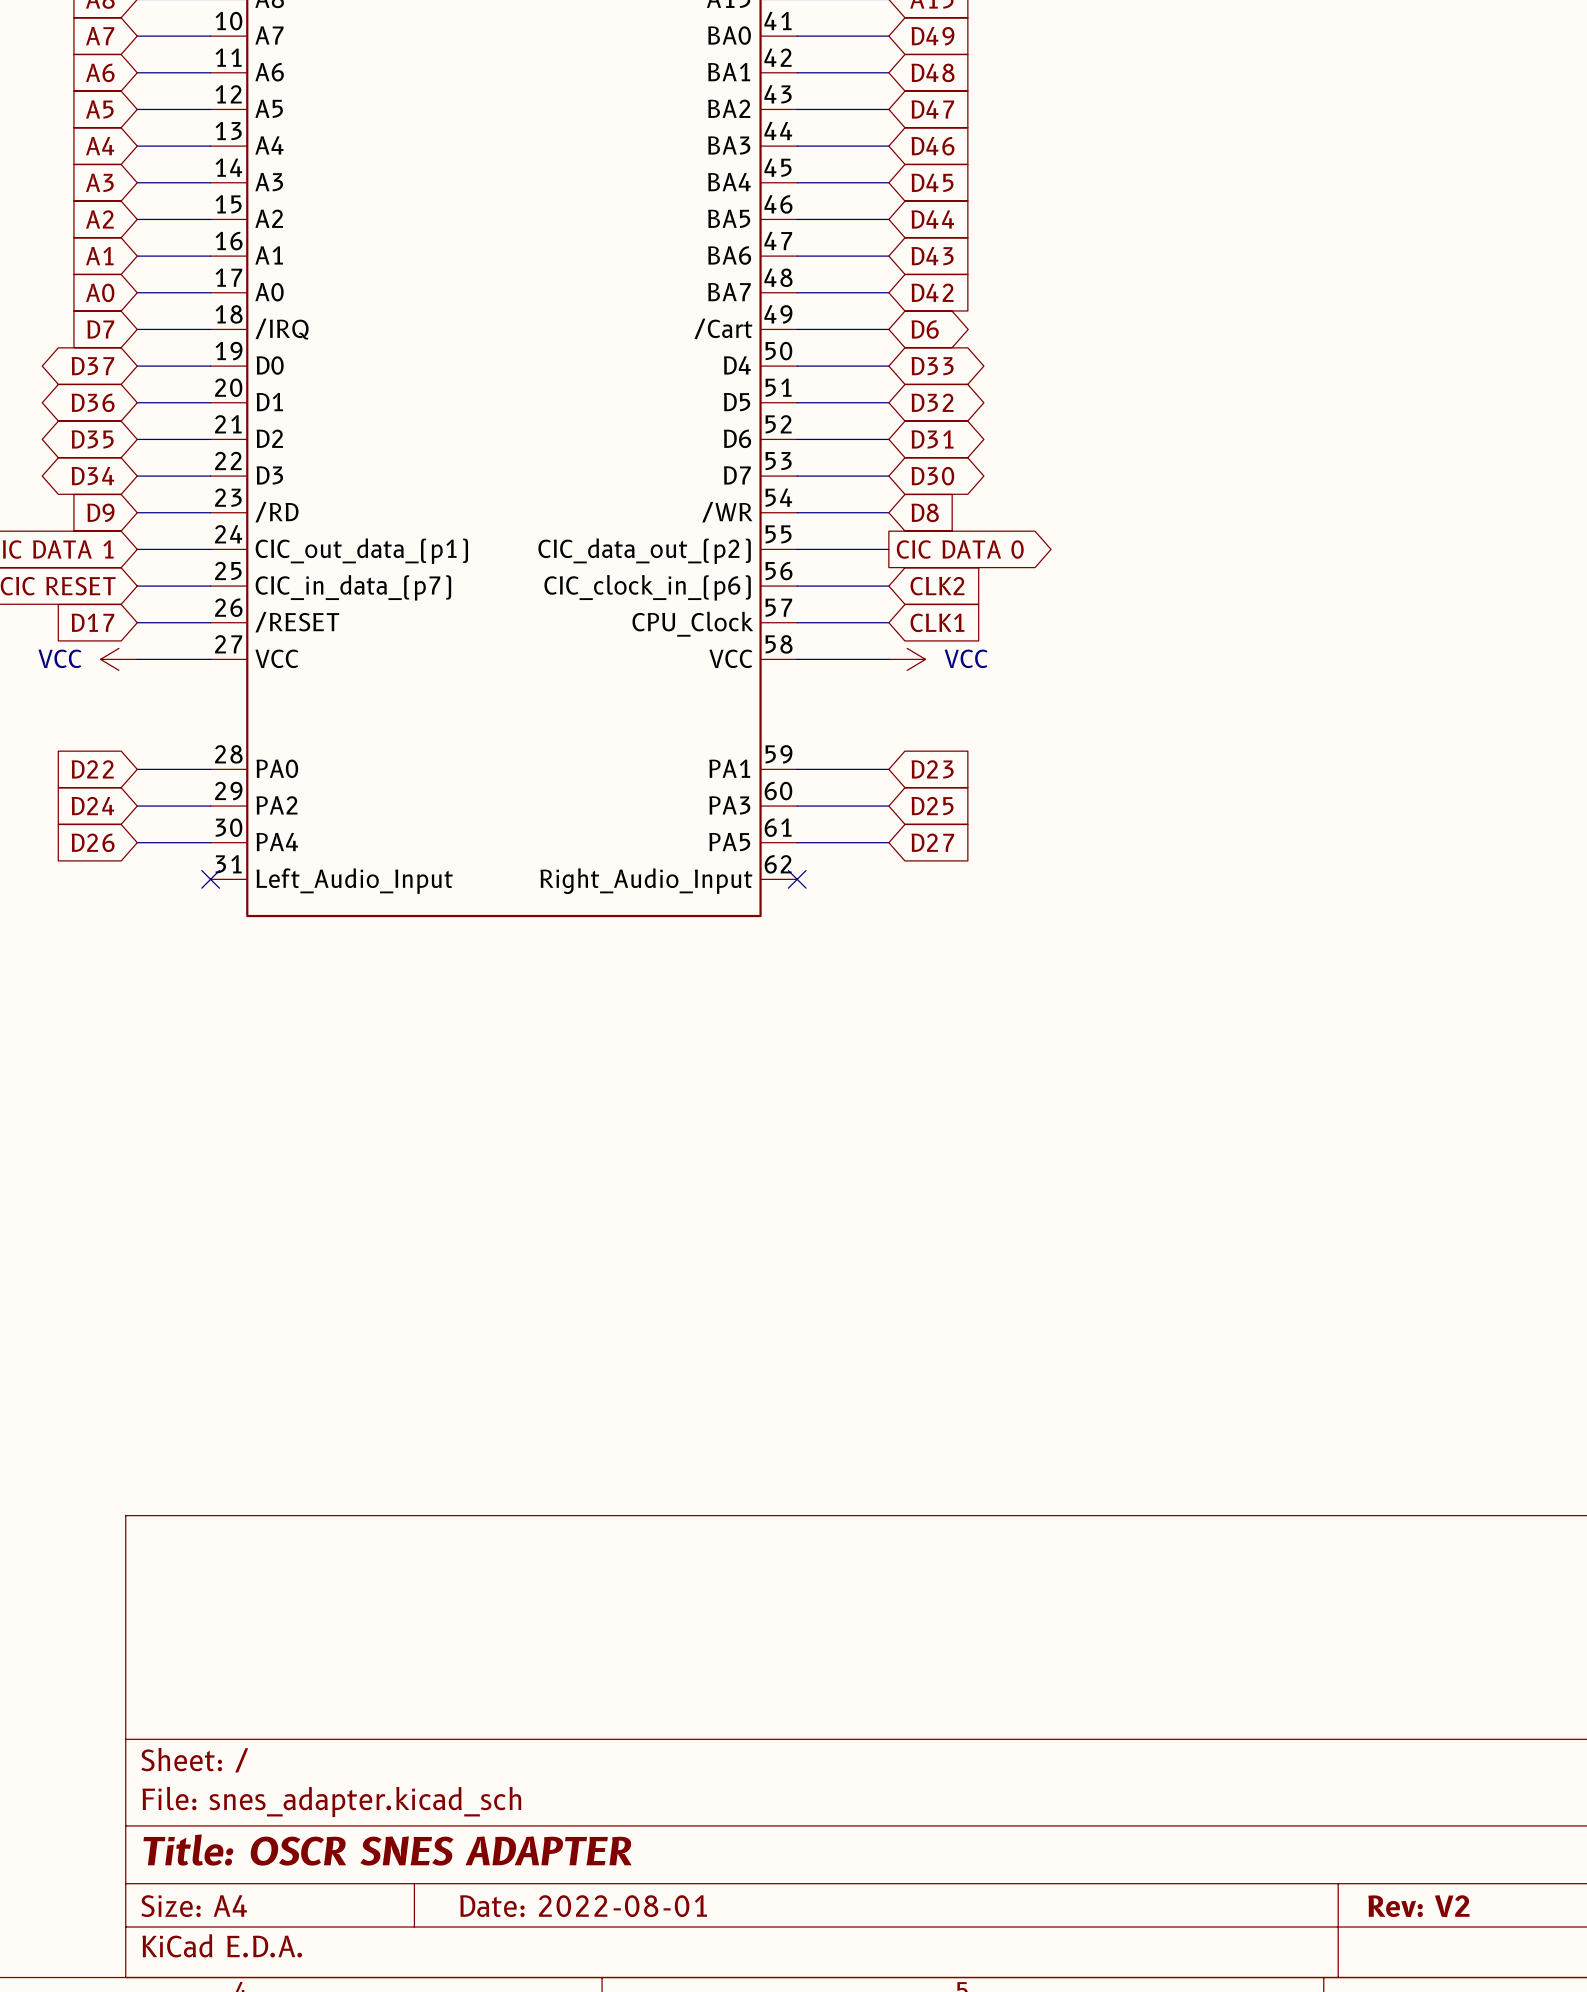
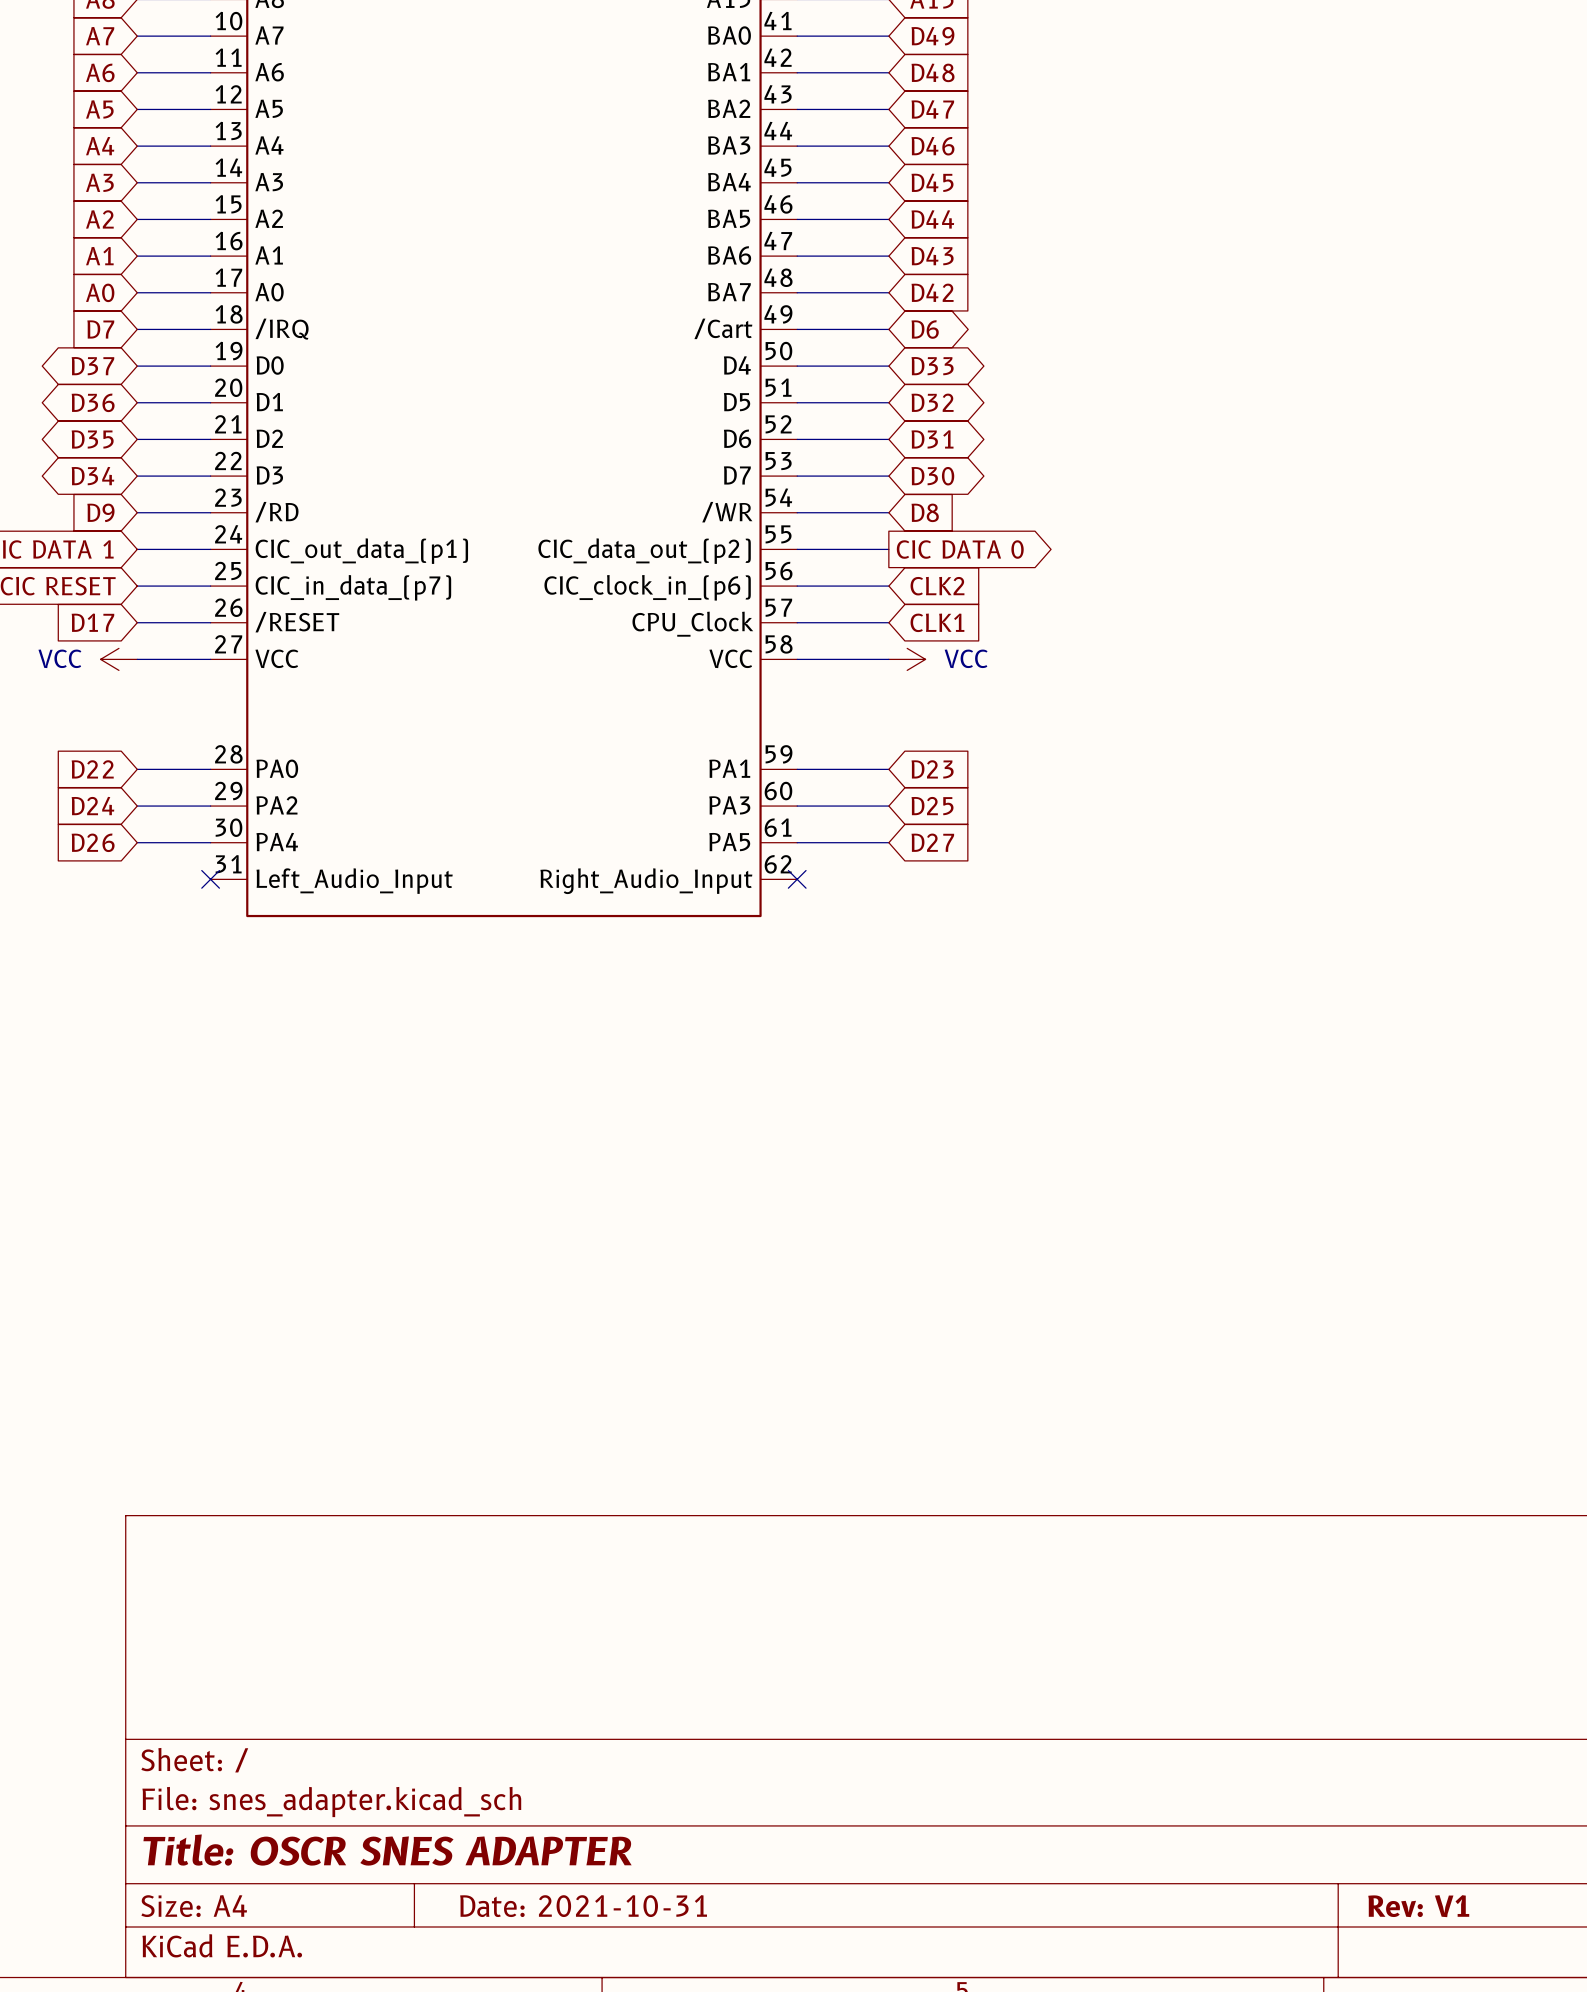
title block: Date: 2022-08-01 (583, 1906) -> Date: 2021-10-31 (583, 1906)
title block: Rev: V2 (1418, 1906) -> Rev: V1 (1418, 1906)

